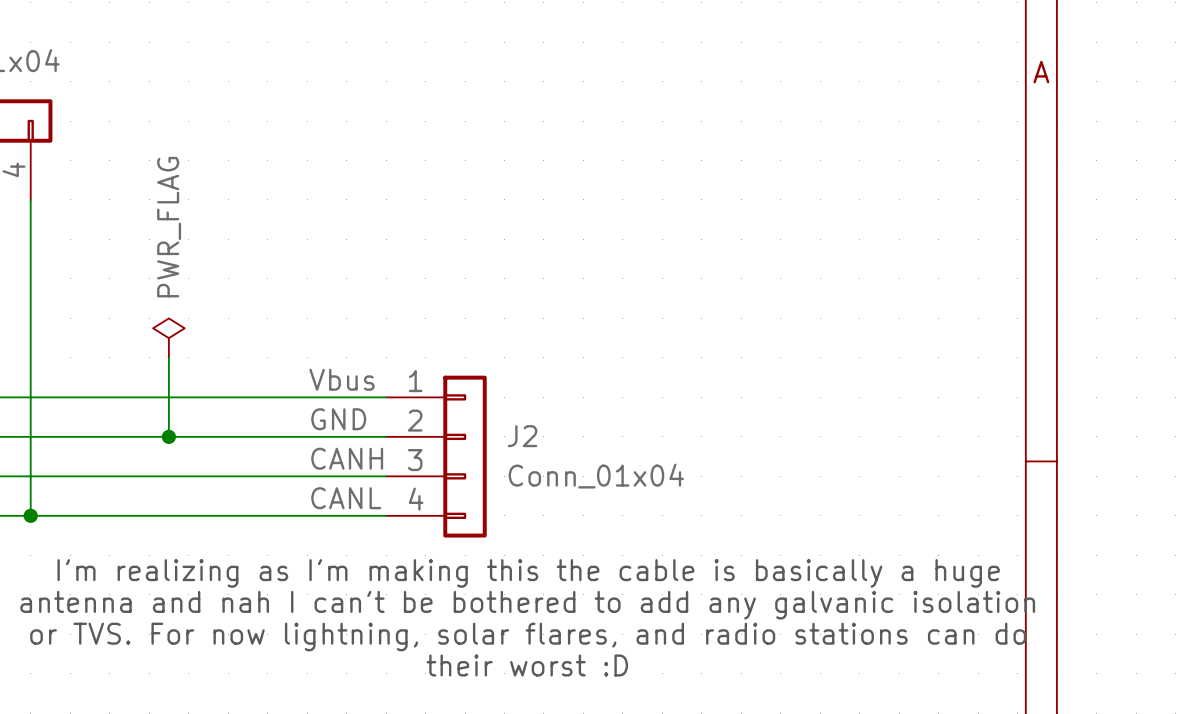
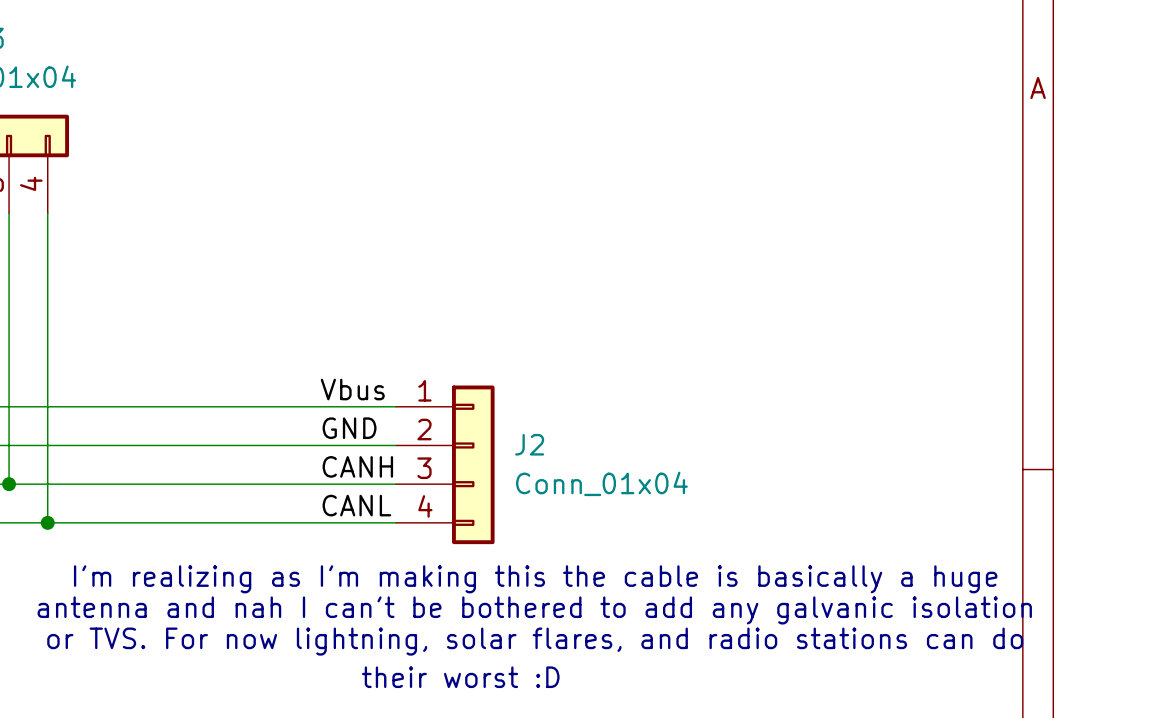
power symbol: PWR_FLAG (168, 338) -> none
wire: (168, 357) (168, 436) -> none
junction: (168, 436) -> none
text position: their worst :D (527, 665) -> their worst :D (460, 677)

